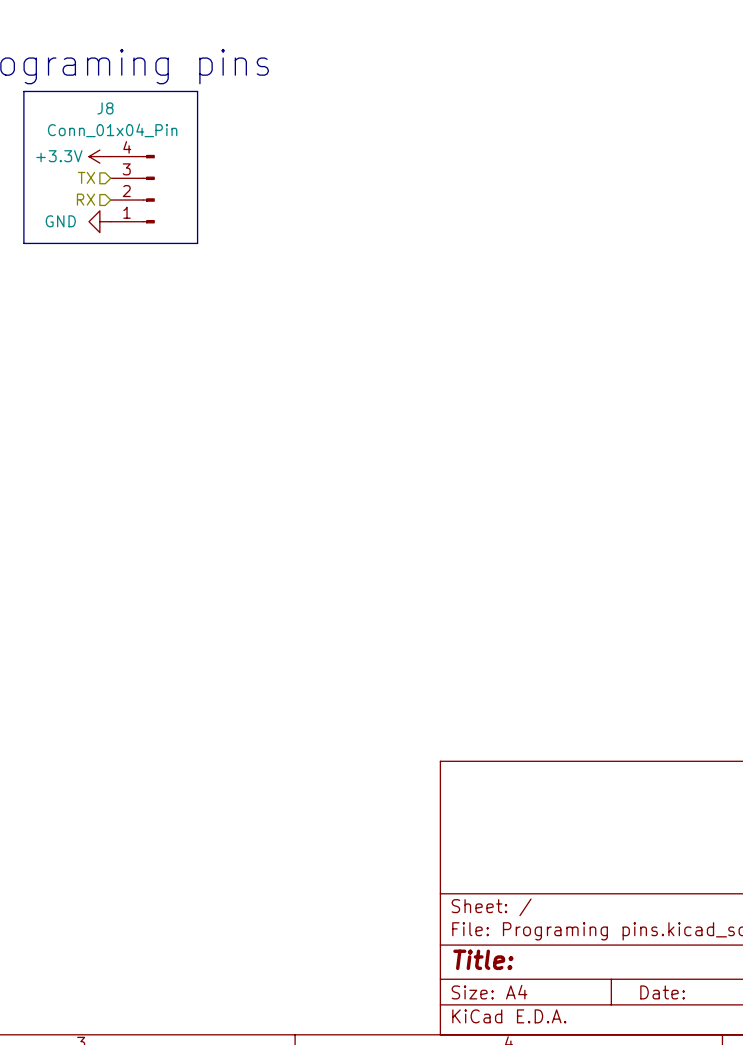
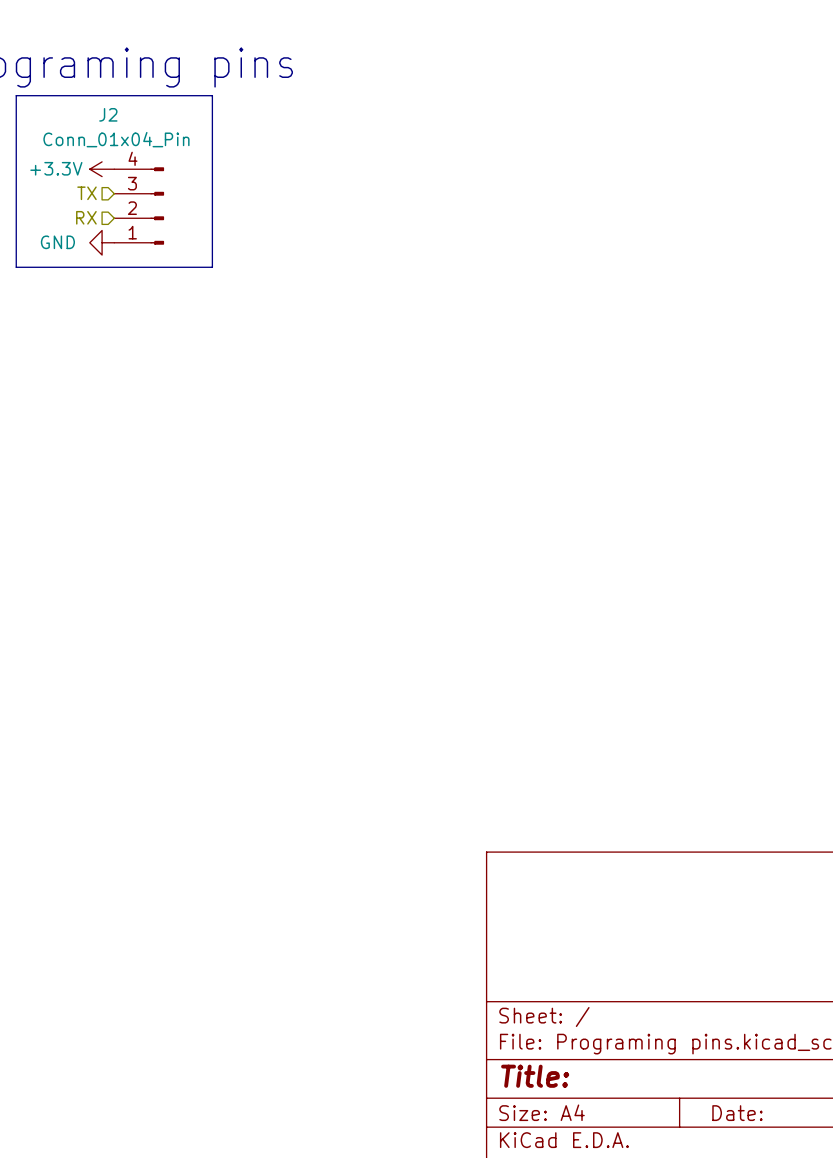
J8 name: J8 (105, 108) -> J2 (108, 114)

